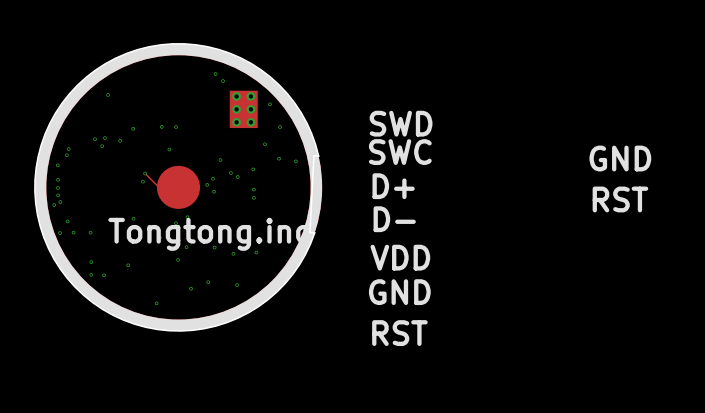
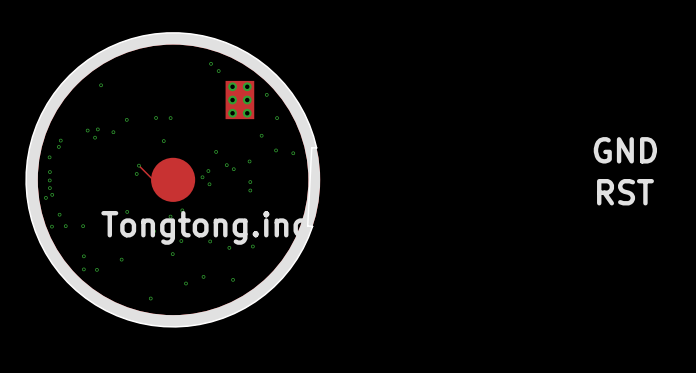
text: SWD (401, 123) -> none
text: SWC (400, 152) -> none
text: D+ (393, 186) -> none
text: D- (394, 219) -> none
text: VDD (400, 257) -> none
text: GND (399, 292) -> none
text: RST (399, 333) -> none

